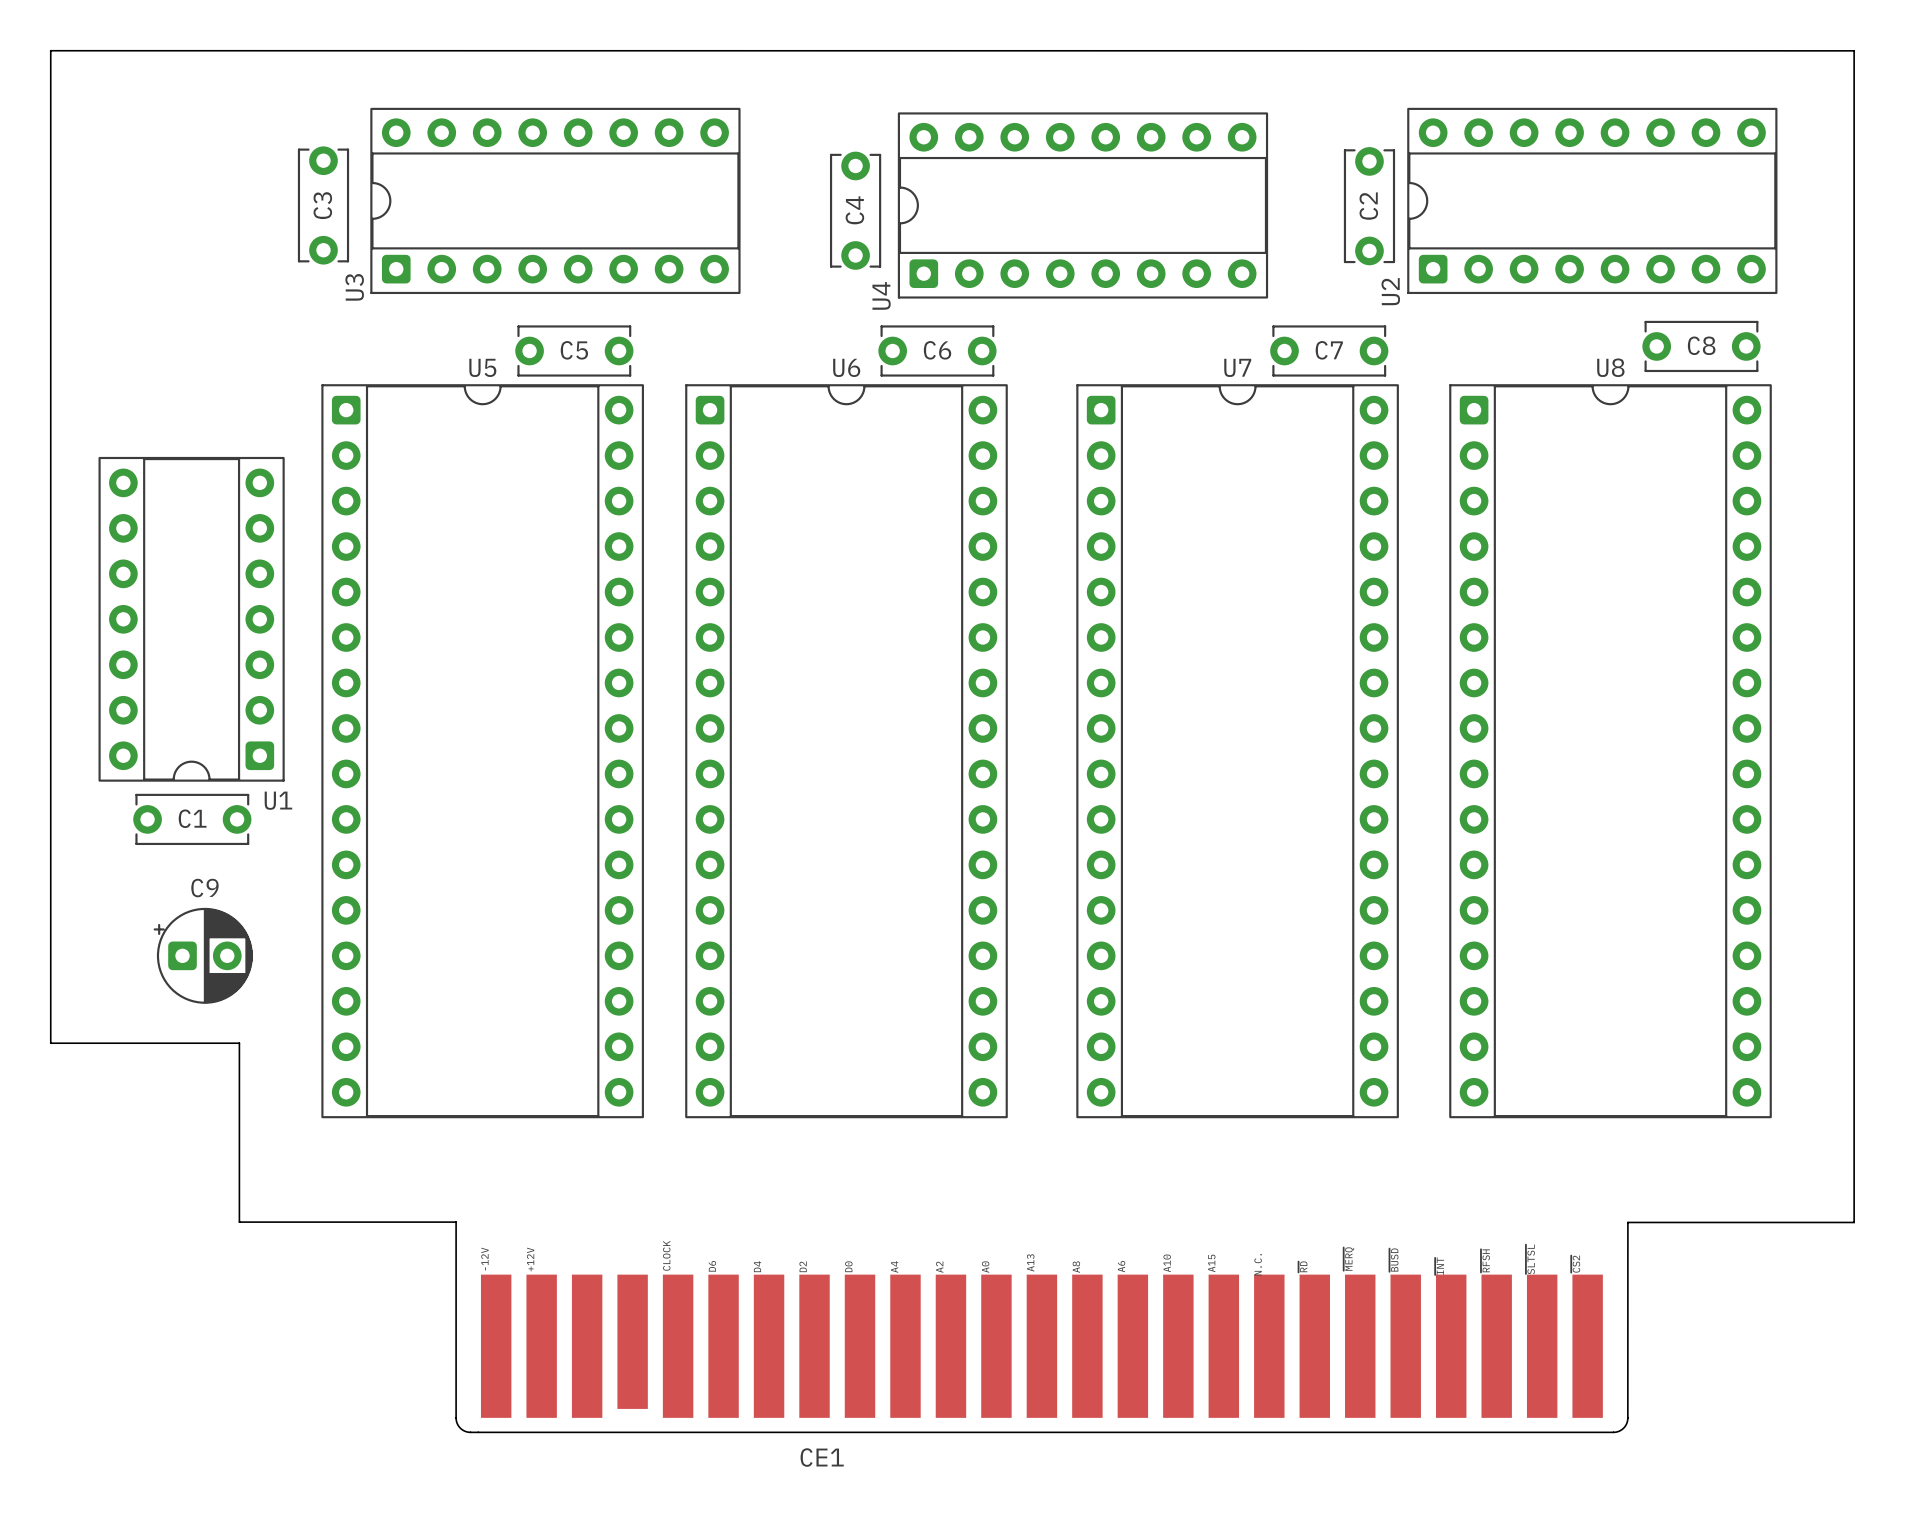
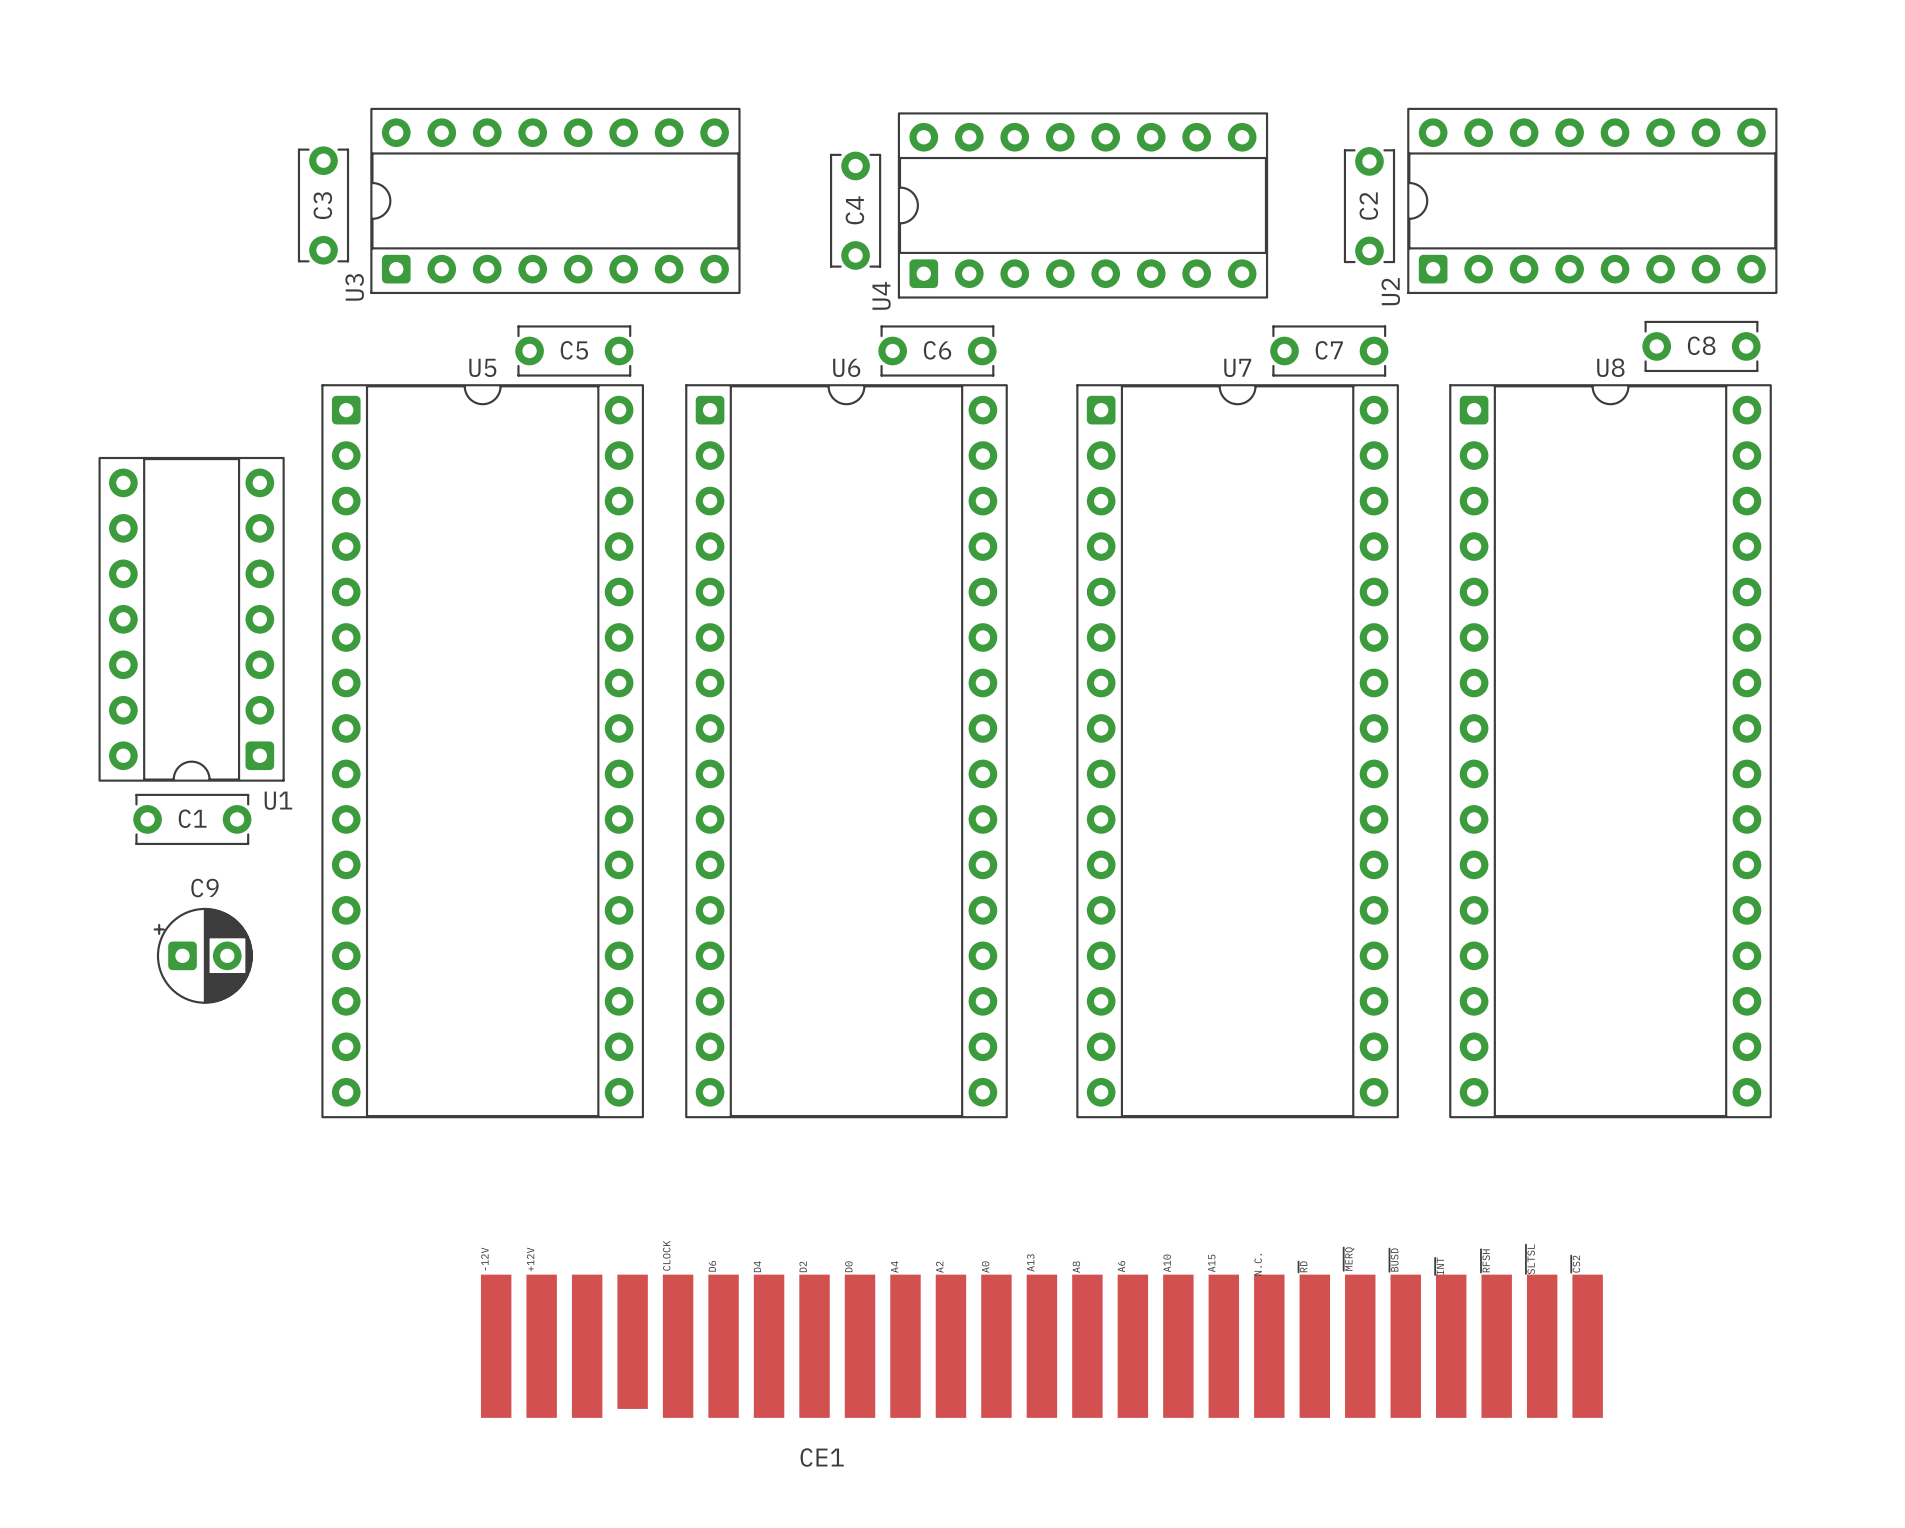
board edge: (50, 50) (1854, 50) (1854, 1222) (1627, 1222) (1627, 1418) (1623, 1428) (1615, 1432) (470, 1432) (462, 1430) (458, 1425) (456, 1417) (456, 1222) (239, 1222) (239, 1043) (50, 1043) (50, 50) -> none

